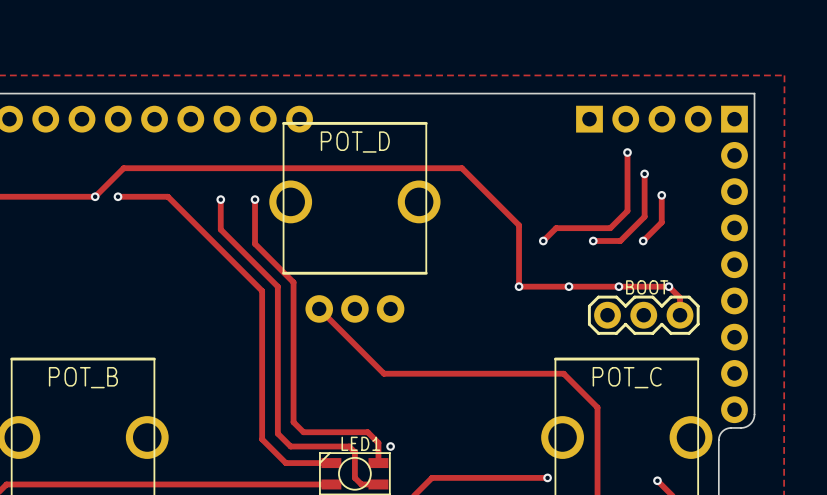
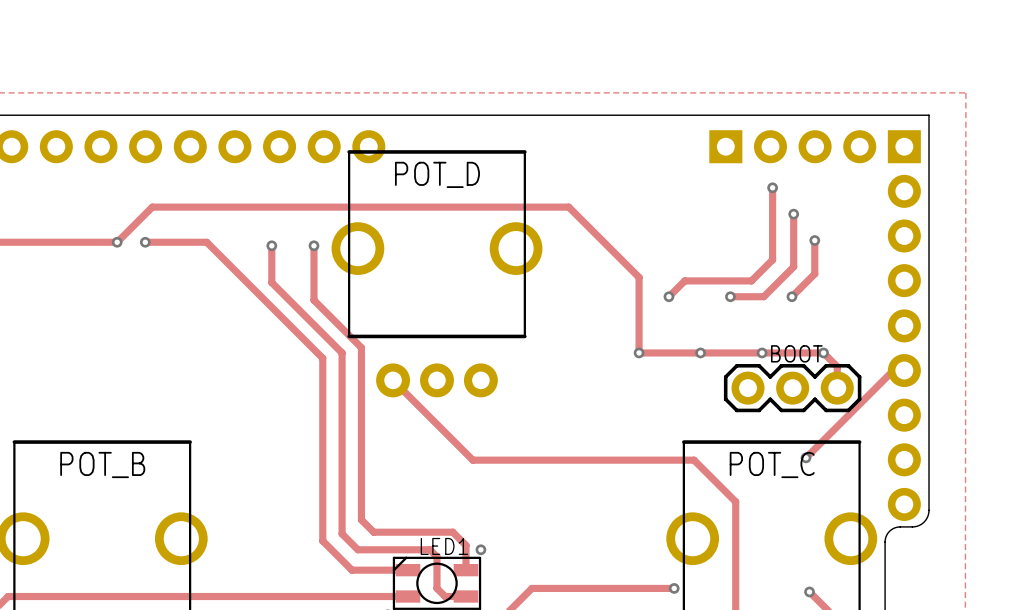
track: none -> (904, 370) (893, 370) (806, 457)
via: none -> (806, 457)

